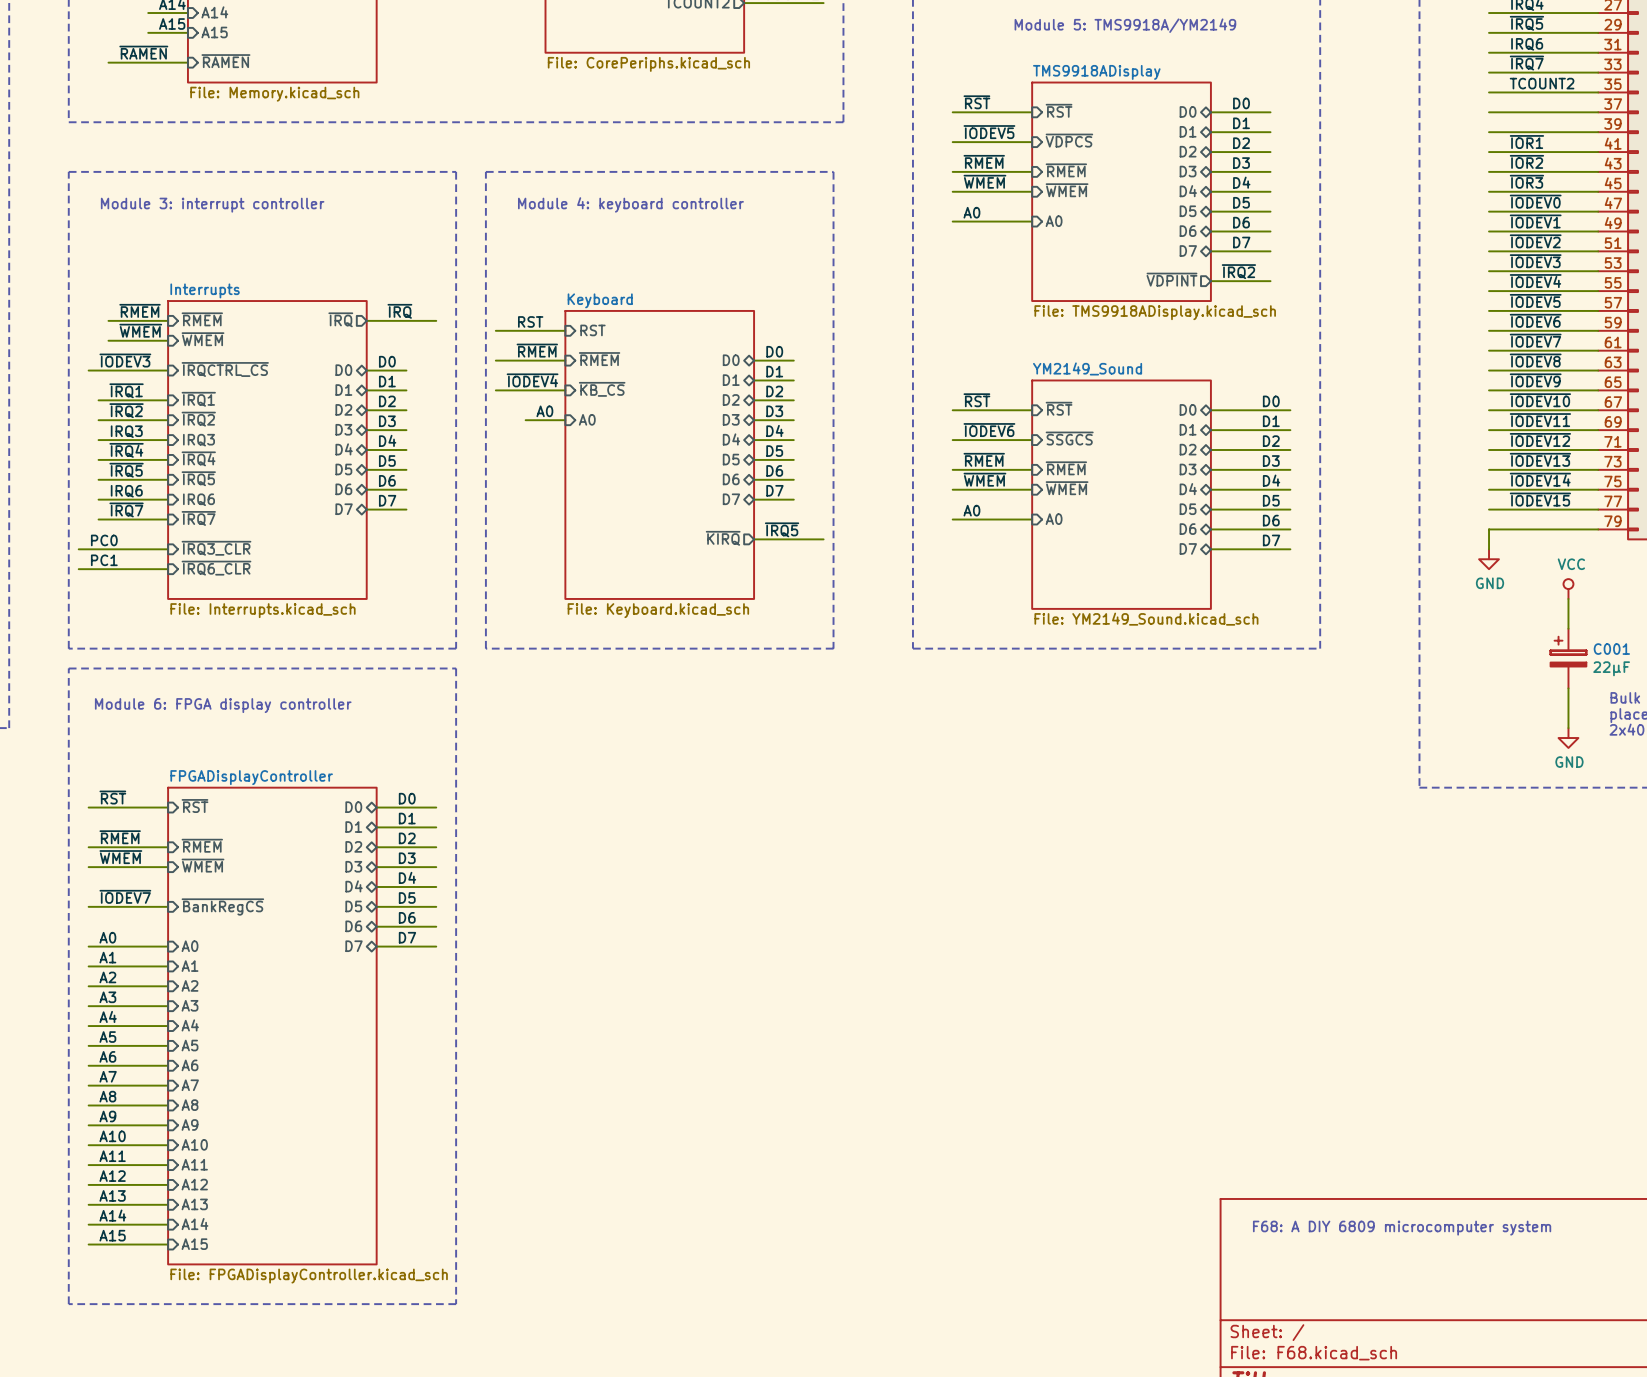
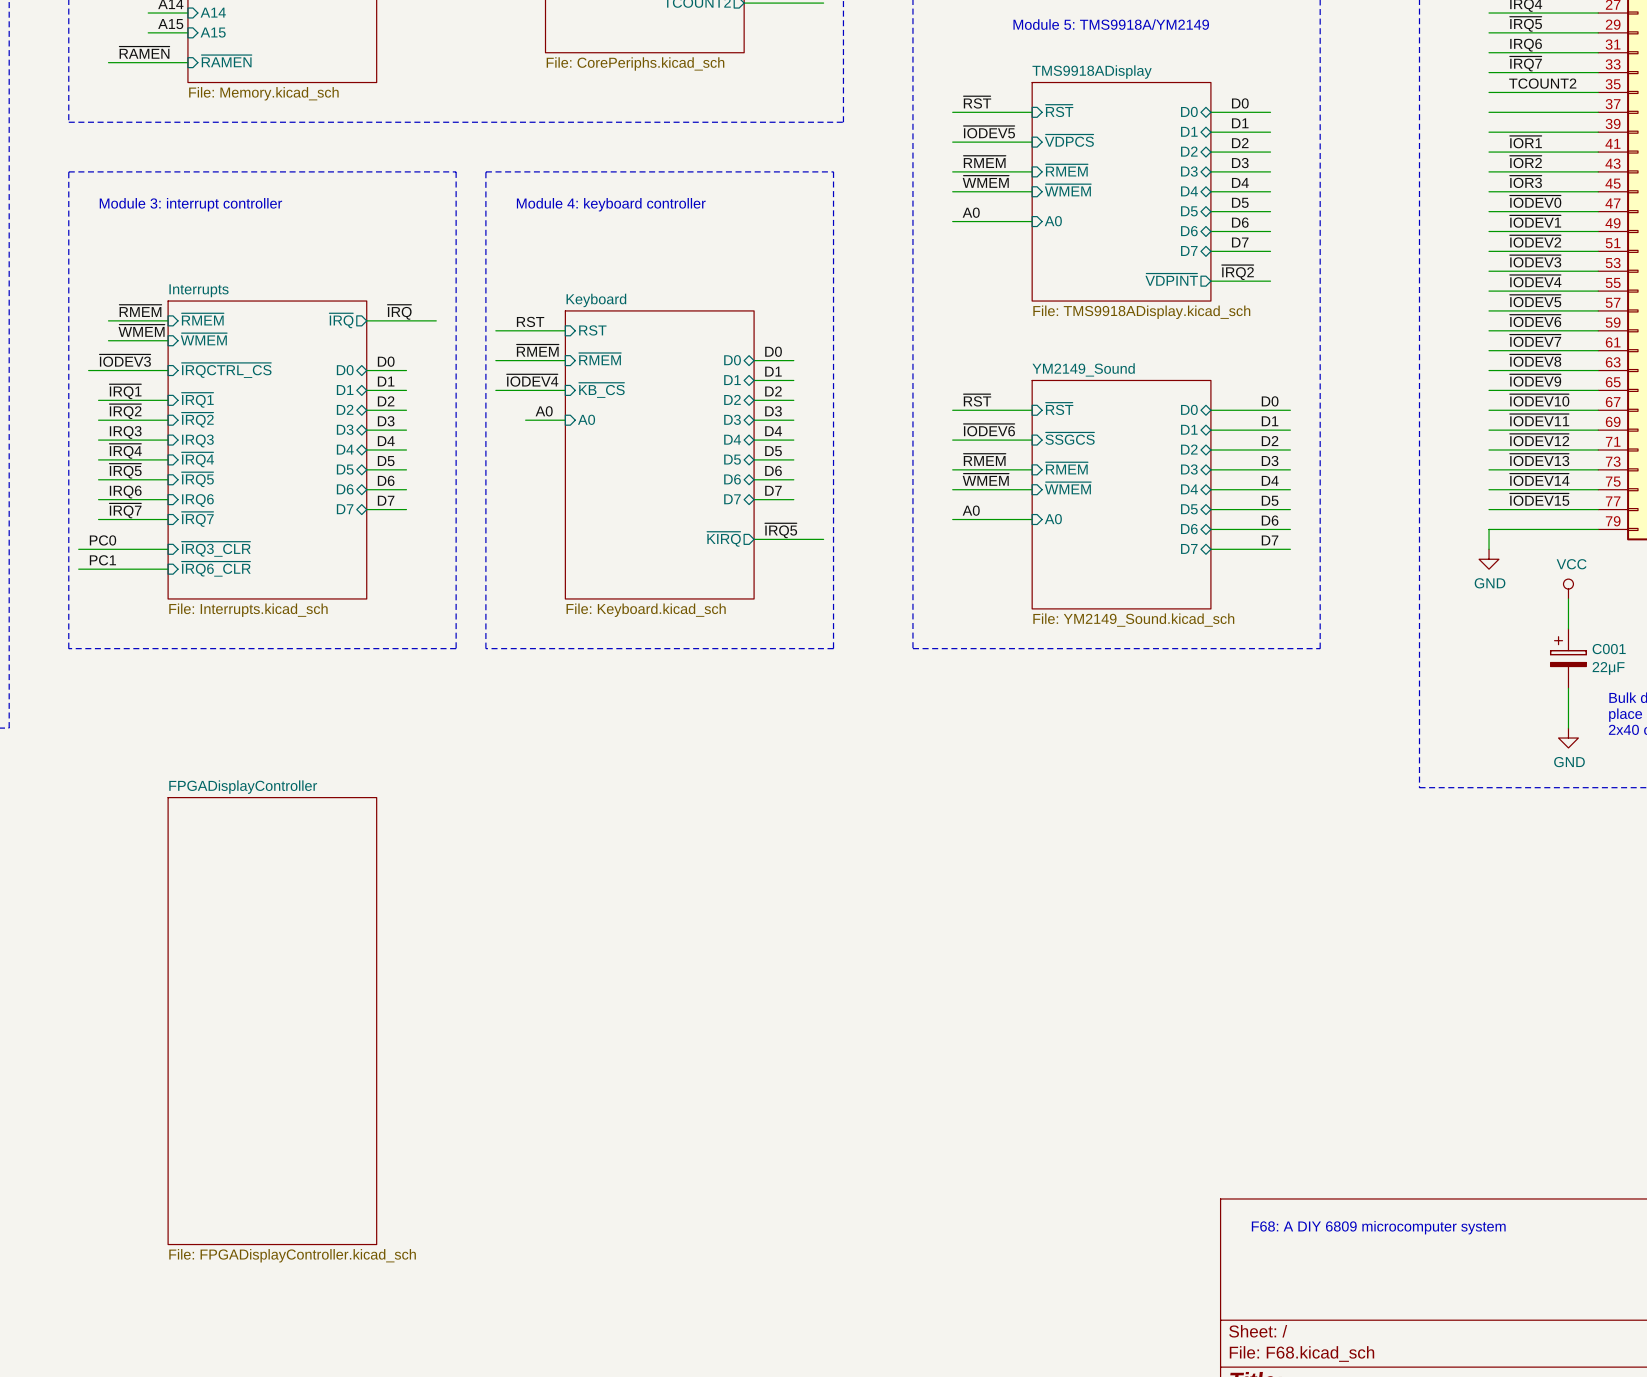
line: (68, 668) (456, 668) (456, 1304) (68, 1304) (68, 668) -> none
text: Module 6: FPGA display controller (223, 705) -> none
sheet FPGADisplayController shape: [167, 787, 378, 1265] -> [167, 797, 378, 1246]
label: ~{RST} (112, 797) -> none
label: D0 (407, 798) -> none
sheet pin: ~{RST} (195, 806) -> none
wire: (88, 807) (168, 807) -> none
sheet pin: D0 (353, 807) -> none
wire: (376, 807) (436, 807) -> none
label: D1 (407, 818) -> none
sheet pin: D1 (353, 827) -> none
wire: (376, 827) (436, 827) -> none
label: ~{RMEM} (120, 837) -> none
label: D2 (407, 838) -> none
sheet pin: ~{RMEM} (202, 845) -> none
sheet pin: D2 (353, 846) -> none
wire: (88, 847) (168, 847) -> none
wire: (376, 847) (436, 847) -> none
label: ~{WMEM} (120, 857) -> none
label: D3 (407, 858) -> none
sheet pin: ~{WMEM} (203, 865) -> none
sheet pin: D3 (353, 866) -> none
wire: (88, 867) (168, 867) -> none
wire: (376, 867) (436, 867) -> none
label: D4 (407, 877) -> none
sheet pin: D4 (354, 886) -> none
wire: (376, 886) (436, 886) -> none
label: ~{IODEV7} (125, 896) -> none
label: D5 (407, 897) -> none
wire: (88, 906) (168, 906) -> none
sheet pin: D5 (353, 906) -> none
wire: (376, 906) (436, 906) -> none
sheet pin: ~{BankRegCS} (222, 907) -> none
label: D6 (407, 917) -> none
sheet pin: D6 (353, 926) -> none
wire: (376, 926) (436, 926) -> none
label: A0 (107, 937) -> none
label: D7 (407, 937) -> none
wire: (88, 946) (168, 946) -> none
sheet pin: A0 (190, 946) -> none
sheet pin: D7 (354, 946) -> none
wire: (376, 946) (436, 946) -> none
label: A1 (107, 957) -> none
wire: (88, 966) (168, 966) -> none
sheet pin: A1 (190, 966) -> none
label: A2 (107, 977) -> none
sheet pin: A2 (190, 985) -> none
wire: (88, 986) (168, 986) -> none
label: A3 (107, 997) -> none
sheet pin: A3 (190, 1005) -> none
wire: (88, 1006) (168, 1006) -> none
label: A4 (108, 1016) -> none
sheet pin: A4 (190, 1025) -> none
wire: (88, 1026) (168, 1026) -> none
label: A5 (107, 1037) -> none
wire: (88, 1045) (168, 1045) -> none
sheet pin: A5 (190, 1045) -> none
label: A6 (107, 1056) -> none
wire: (88, 1065) (168, 1065) -> none
sheet pin: A6 (190, 1065) -> none
label: A7 (108, 1076) -> none
wire: (88, 1085) (168, 1085) -> none
sheet pin: A7 (190, 1085) -> none
label: A8 (107, 1096) -> none
wire: (88, 1105) (168, 1105) -> none
sheet pin: A8 (190, 1105) -> none
label: A9 (107, 1116) -> none
sheet pin: A9 (190, 1124) -> none
wire: (88, 1125) (168, 1125) -> none
label: A10 (112, 1136) -> none
sheet pin: A10 (194, 1144) -> none
wire: (88, 1145) (168, 1145) -> none
label: A11 (112, 1156) -> none
sheet pin: A11 (194, 1164) -> none
wire: (88, 1165) (168, 1165) -> none
label: A12 (112, 1176) -> none
wire: (88, 1184) (168, 1184) -> none
sheet pin: A12 (194, 1184) -> none
label: A13 (112, 1195) -> none
wire: (88, 1204) (168, 1204) -> none
sheet pin: A13 (194, 1204) -> none
label: A14 (112, 1215) -> none
wire: (88, 1224) (168, 1224) -> none
sheet pin: A14 (194, 1224) -> none
label: A15 (112, 1235) -> none
wire: (88, 1244) (168, 1244) -> none
sheet pin: A15 (194, 1244) -> none

